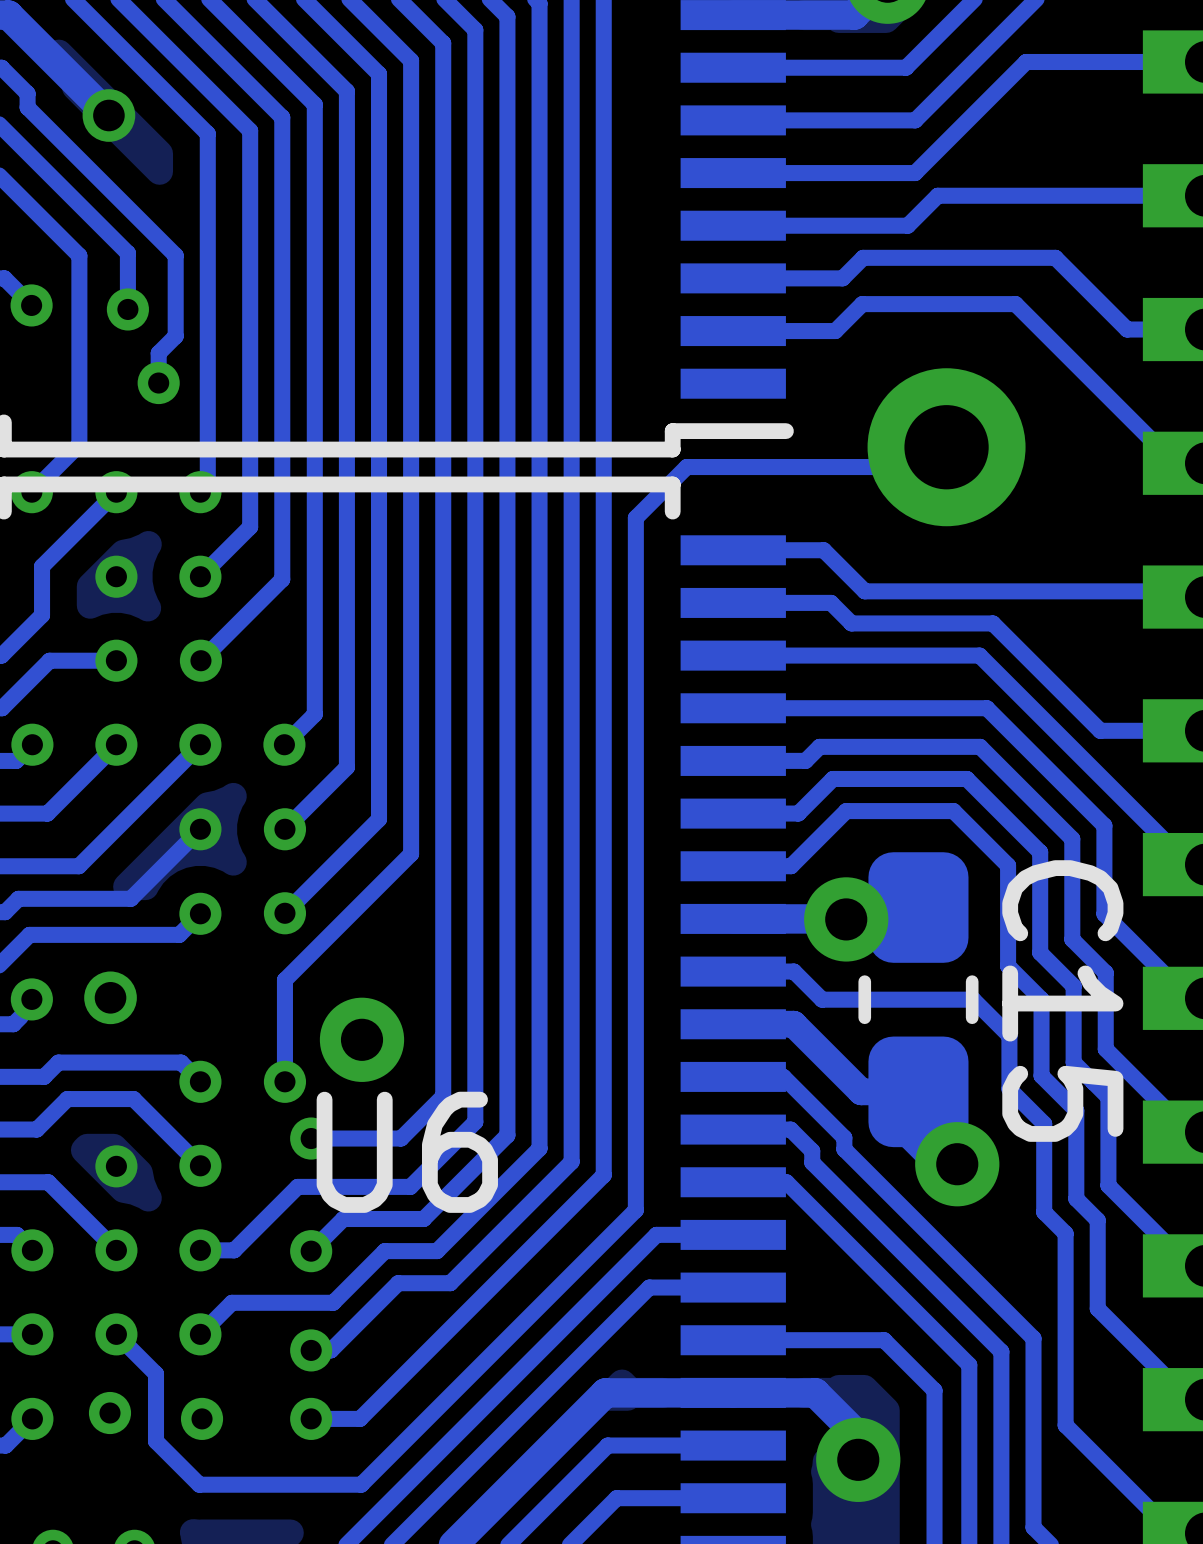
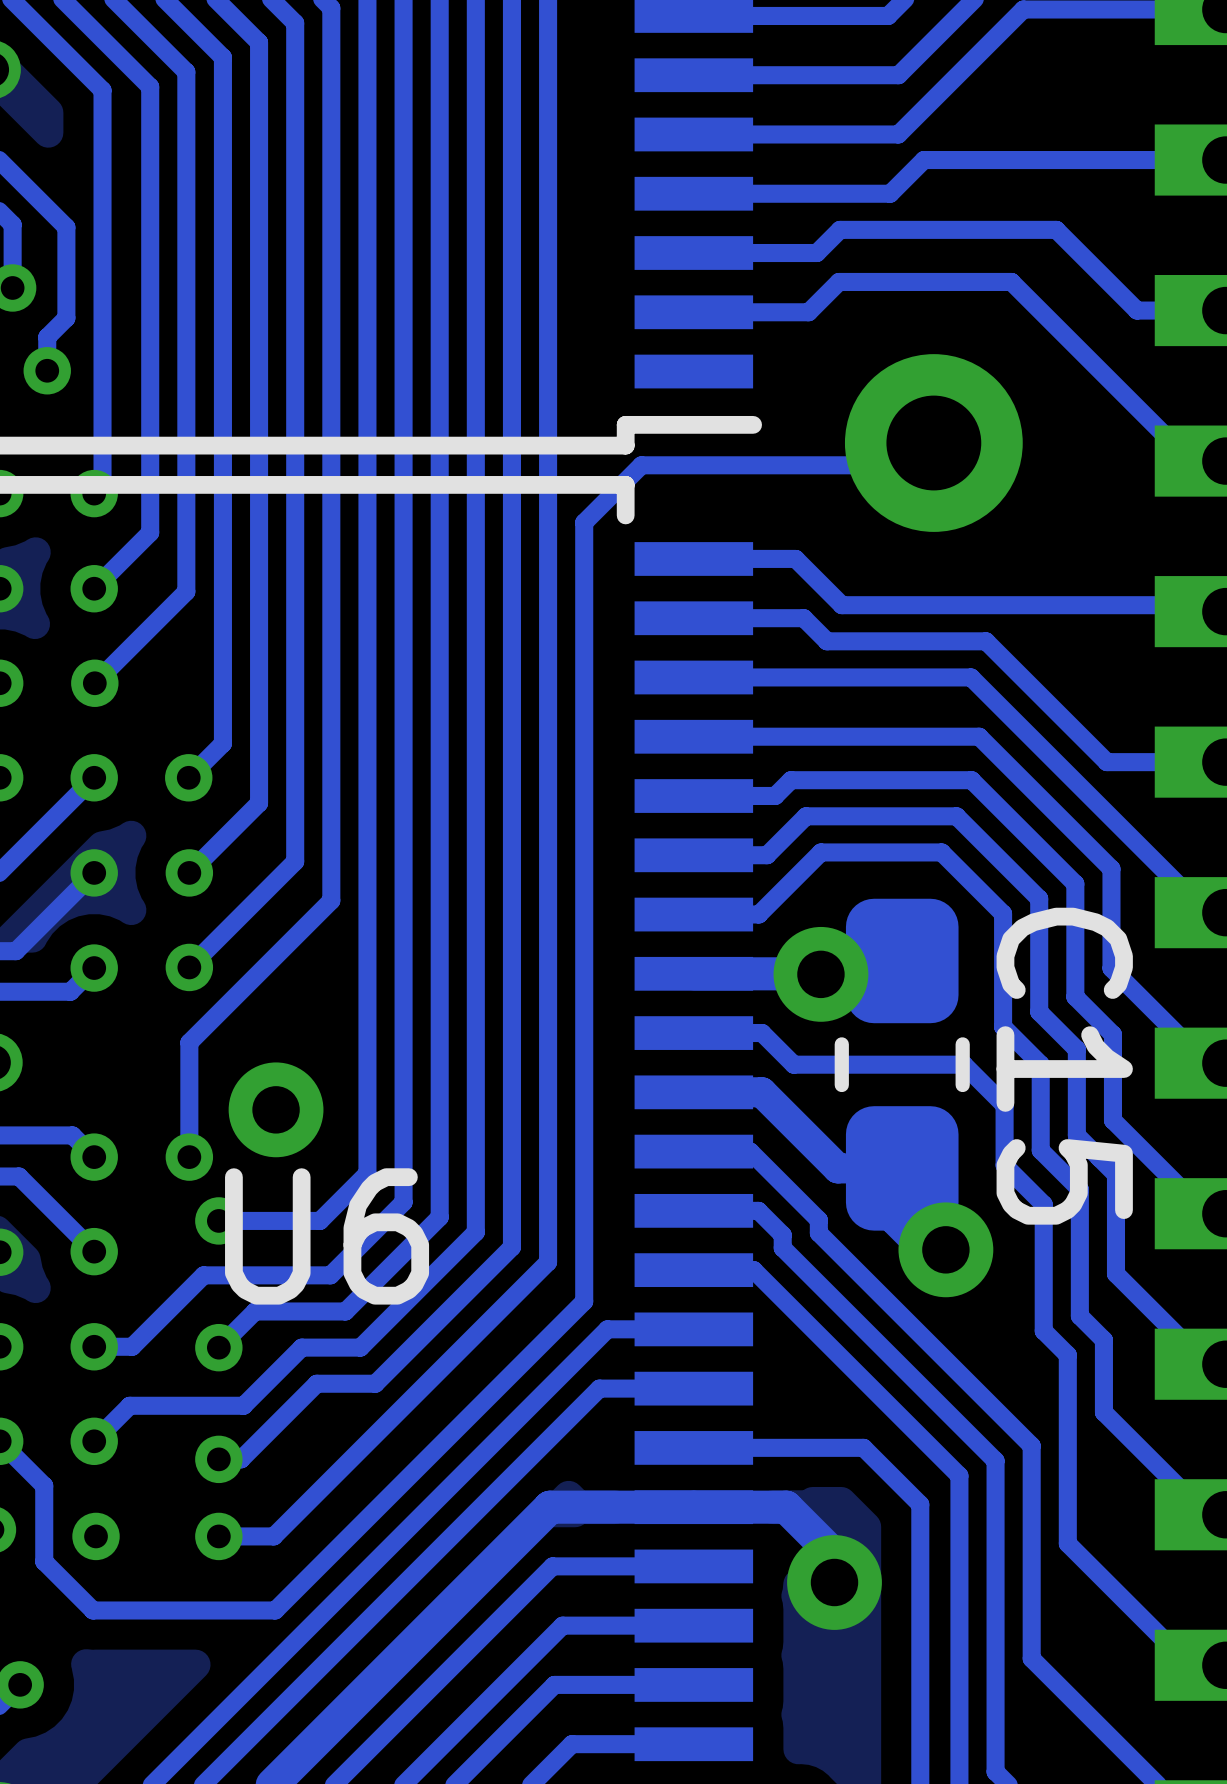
track: (1076, 1198) (1097, 1220) (1097, 1244) -> (1079, 1288) (1079, 1316) (1103, 1340)
track: (1044, 1212) (1065, 1233) (1065, 1257) -> (1043, 1303) (1043, 1331) (1067, 1355)

